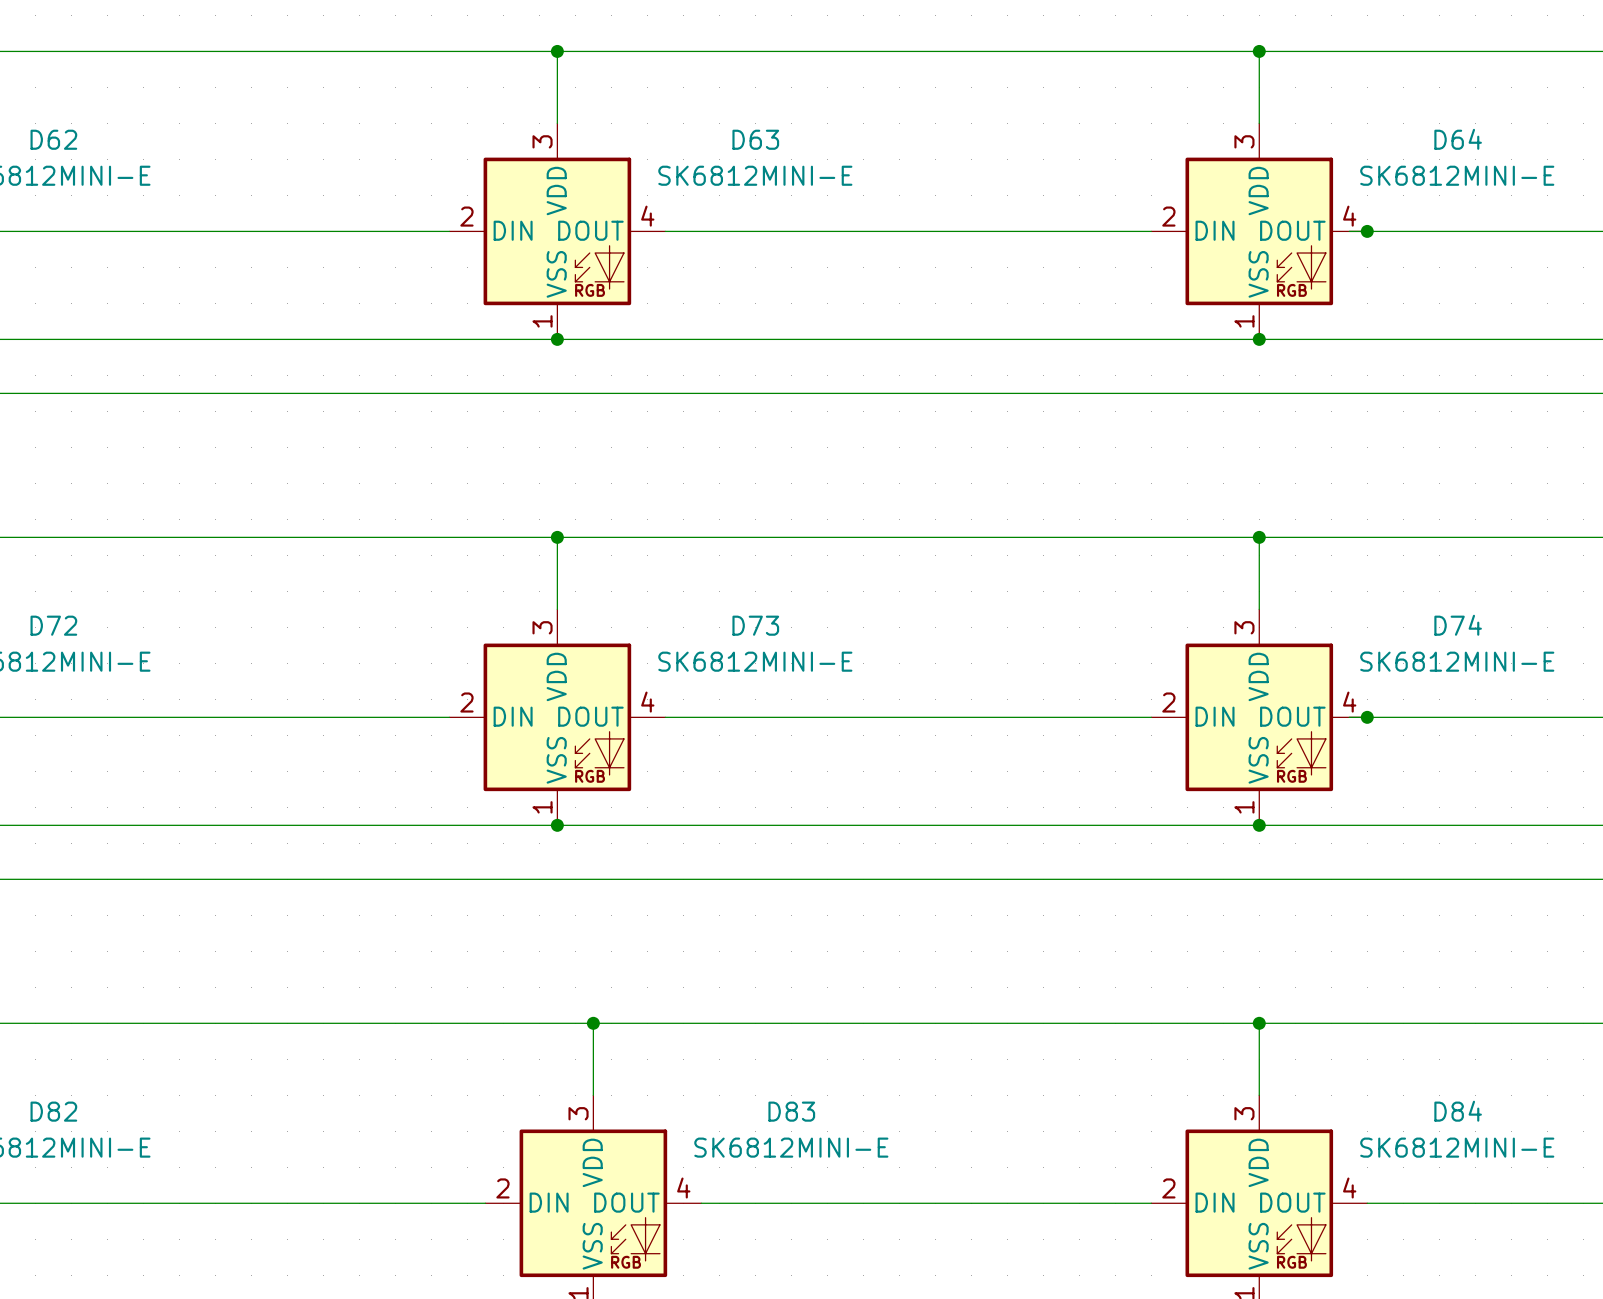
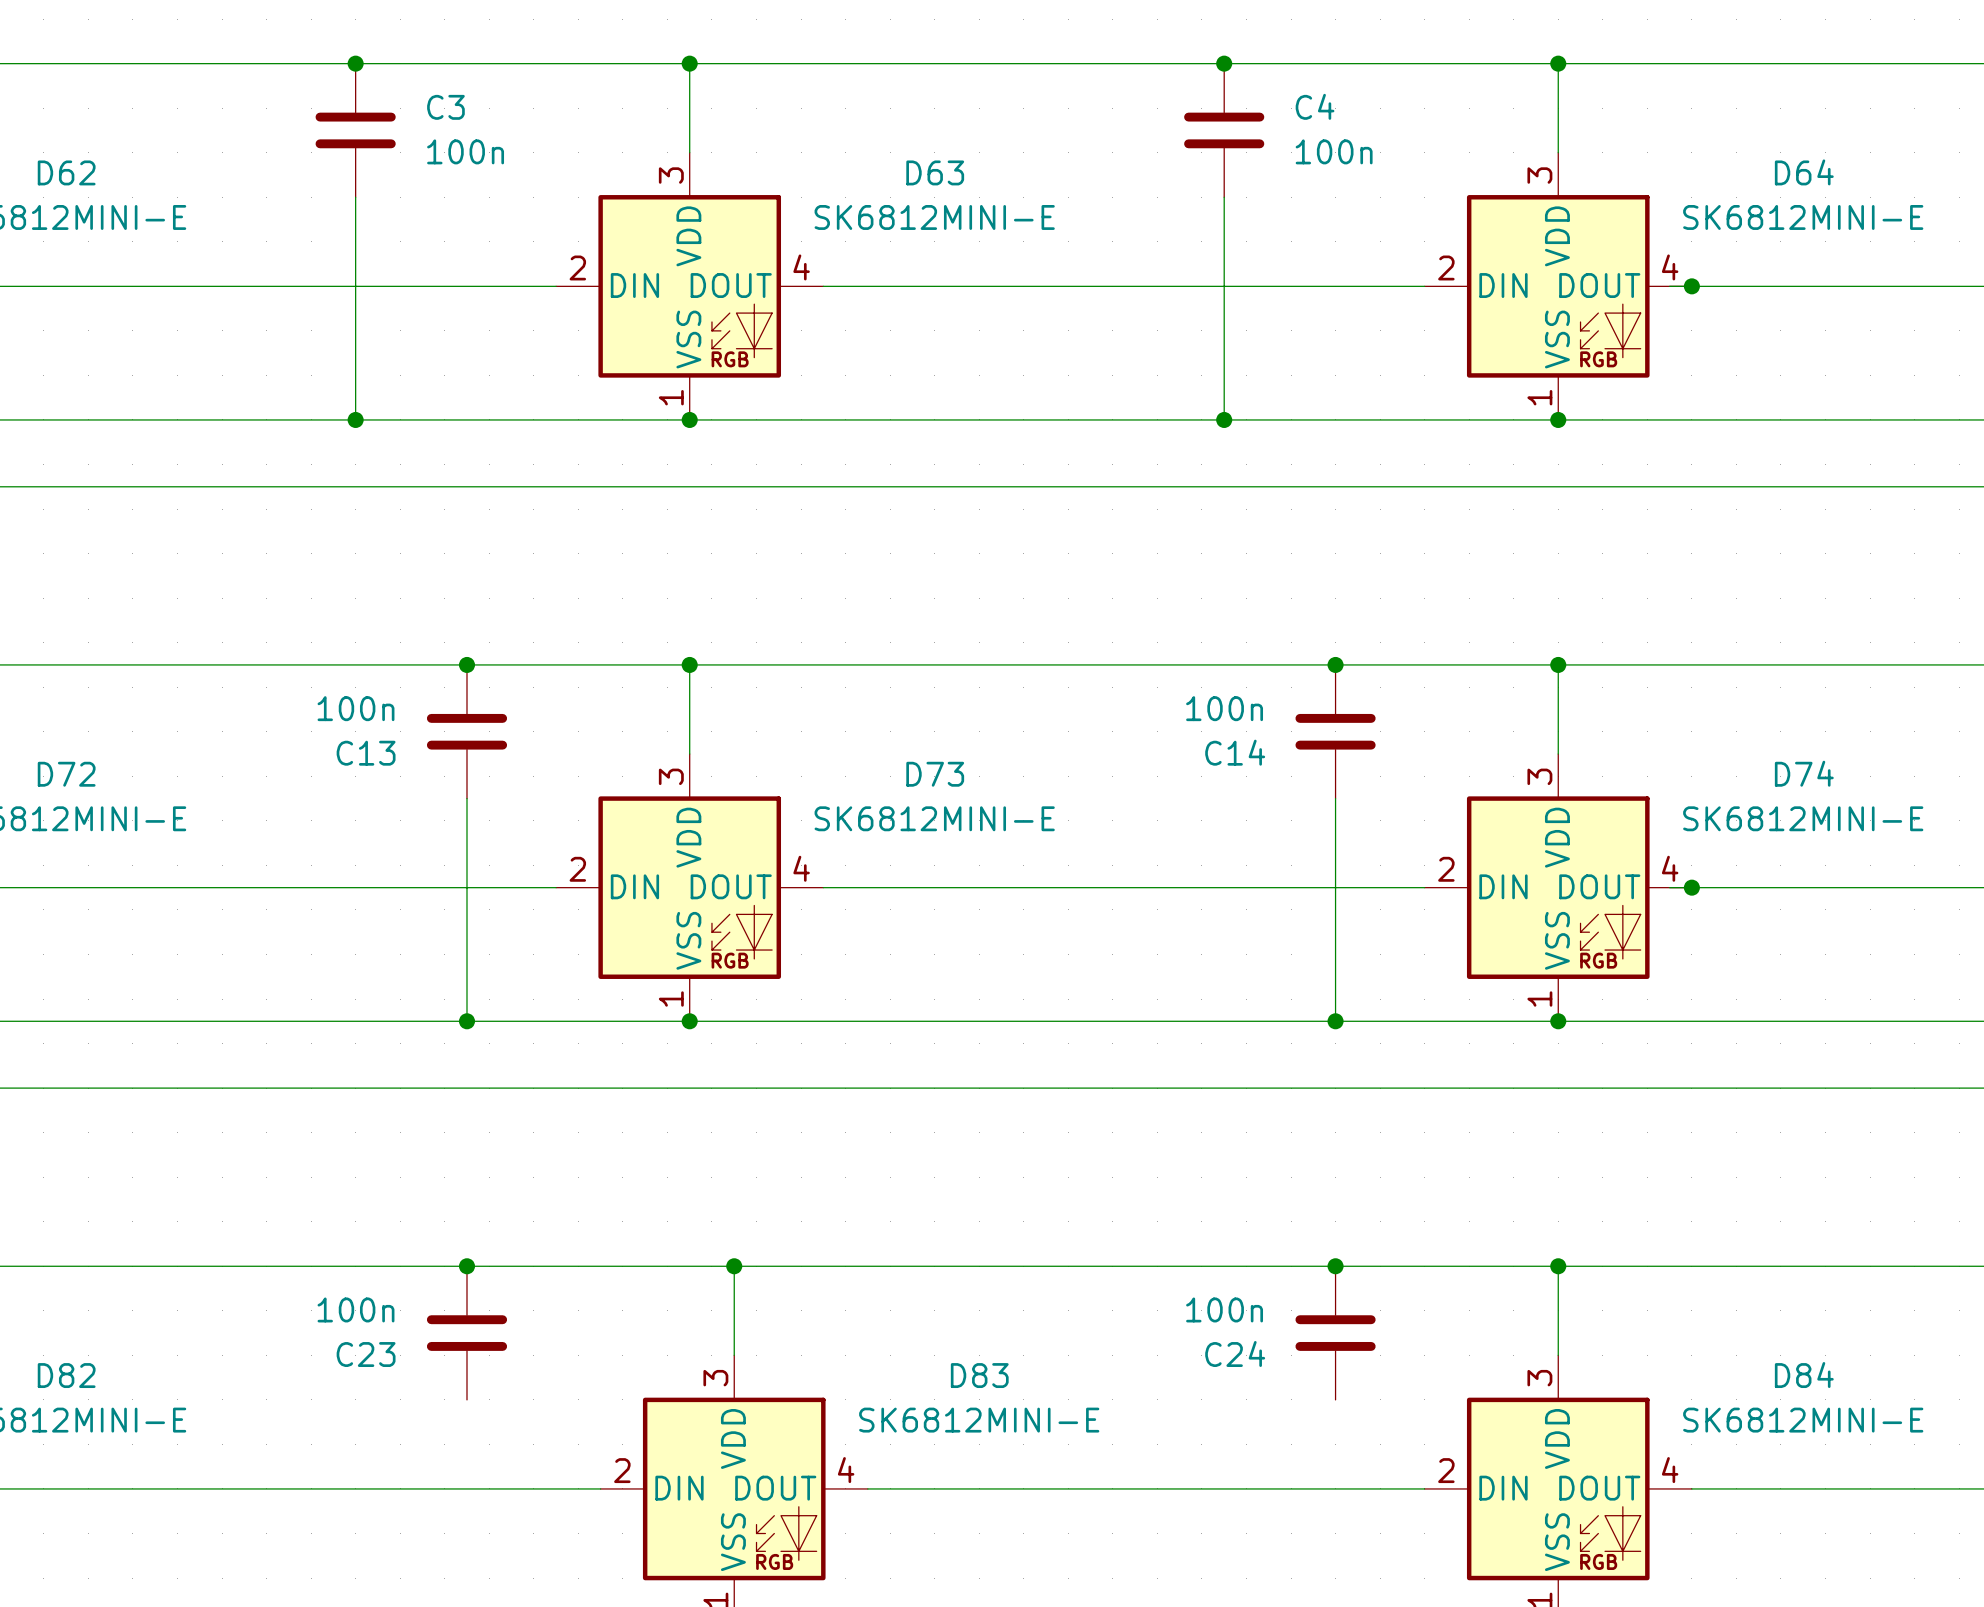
junction: none -> (355, 63)
junction: none -> (1224, 63)
C3: none -> 100n (355, 130)
C4: none -> 100n (1224, 130)
wire: none -> (355, 197) (355, 419)
wire: none -> (1224, 197) (1224, 419)
junction: none -> (355, 419)
junction: none -> (1224, 419)
junction: none -> (466, 664)
junction: none -> (1335, 664)
C13: none -> 100n (466, 731)
C14: none -> 100n (1335, 731)
wire: none -> (466, 798) (466, 1021)
wire: none -> (1335, 798) (1335, 1021)
junction: none -> (466, 1021)
junction: none -> (1335, 1021)
junction: none -> (466, 1266)
junction: none -> (1335, 1266)
C23: none -> 100n (466, 1333)
C24: none -> 100n (1335, 1333)

